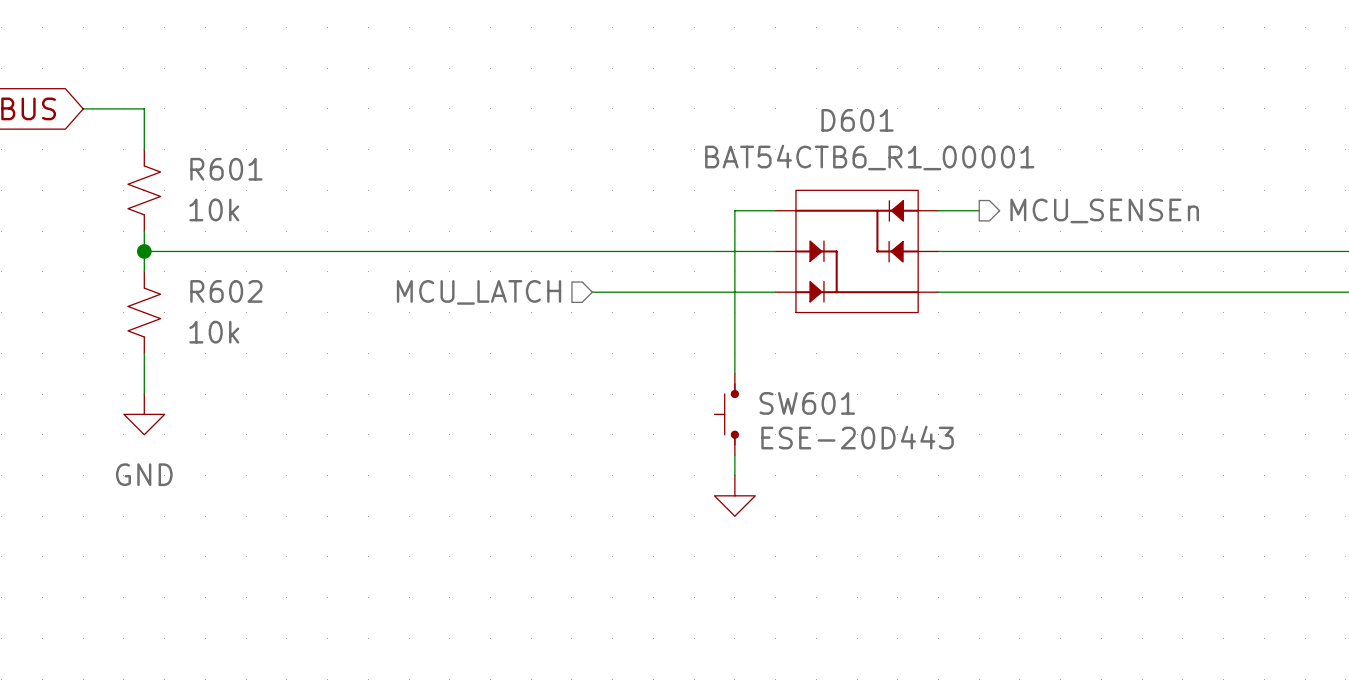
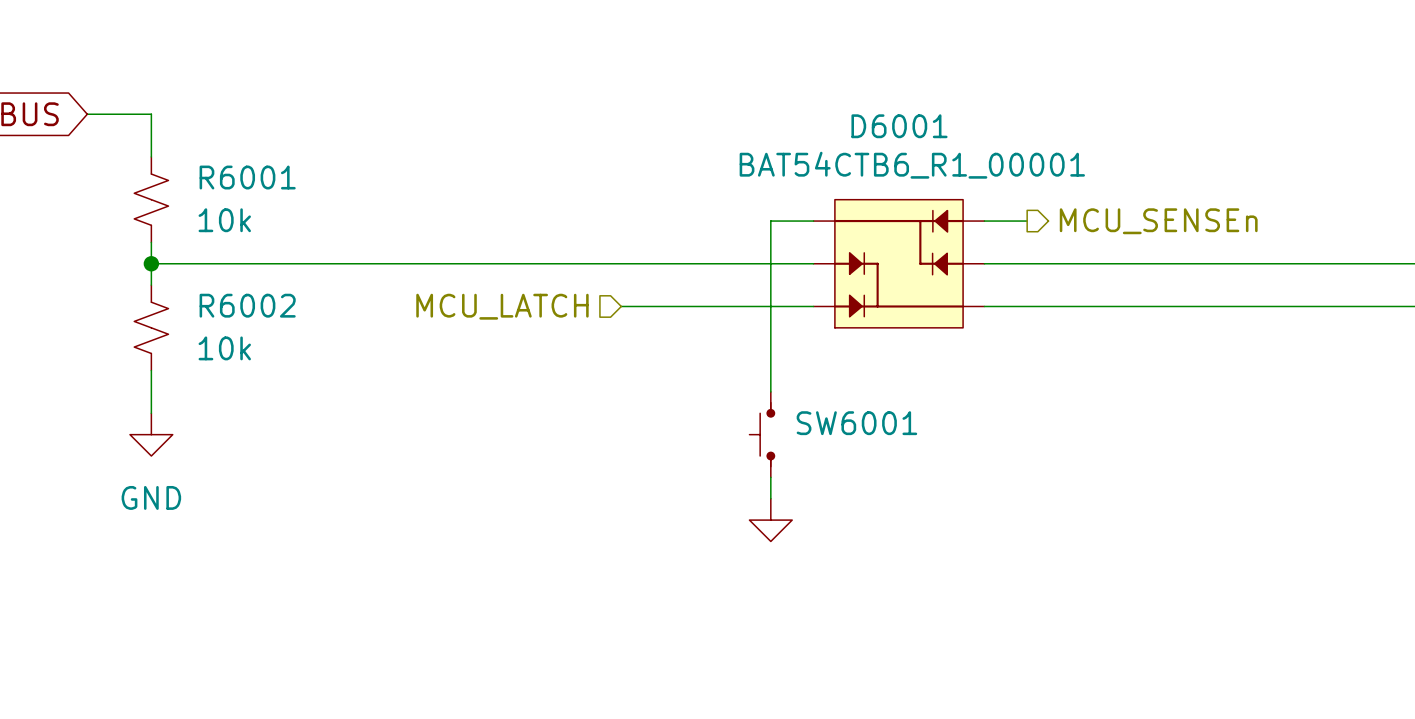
D601 name: D601 (857, 120) -> D6001 (899, 126)
R601 name: R601 (226, 169) -> R6001 (247, 177)
R602 name: R602 (226, 291) -> R6002 (247, 305)
SW601 name: SW601 (807, 403) -> SW6001 (856, 423)
SW601 text: ESE-20D443 (857, 437) -> none

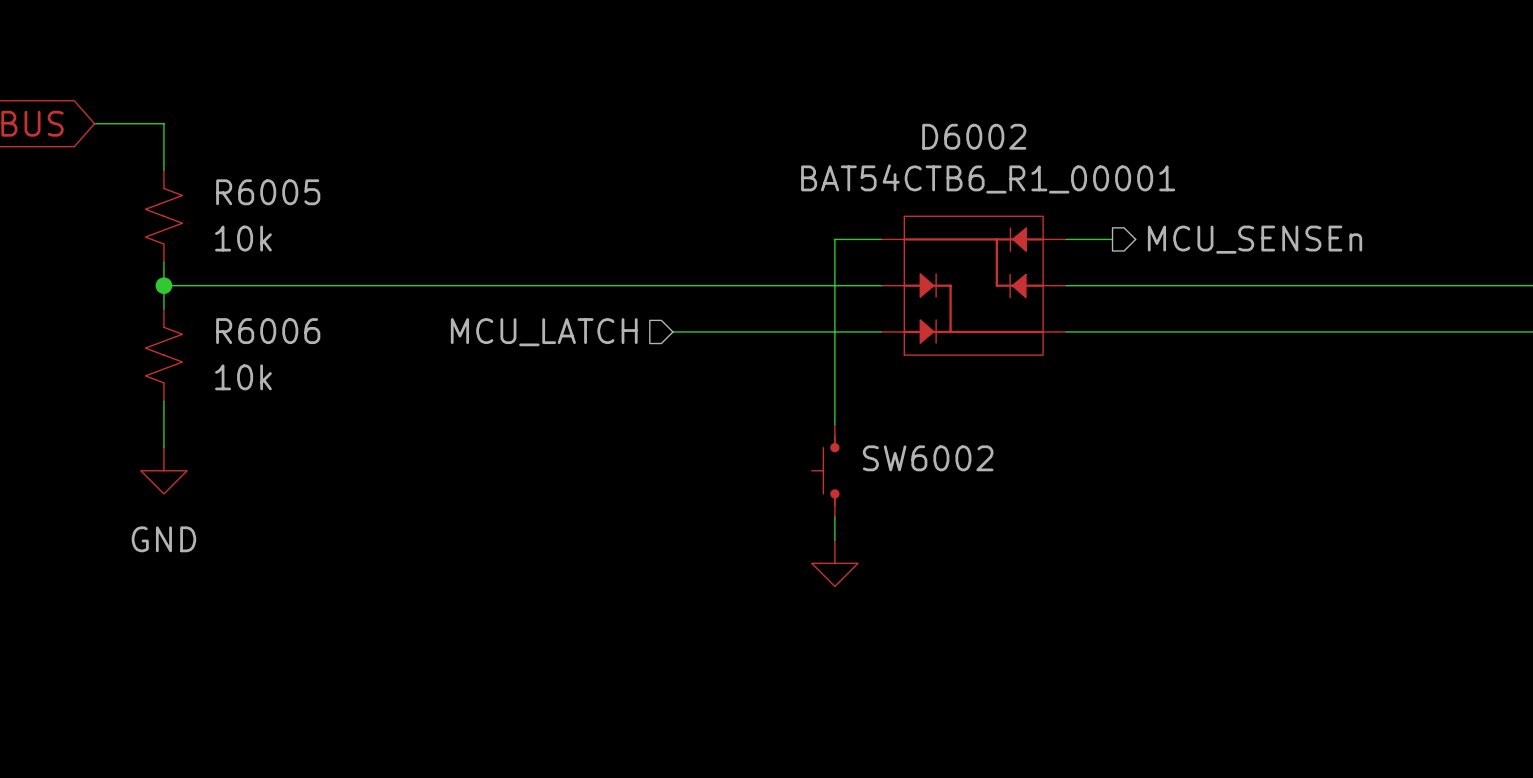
D6001 name: D6001 (899, 126) -> D6002 (974, 136)
R6001 name: R6001 (247, 177) -> R6005 (268, 192)
R6002 name: R6002 (247, 305) -> R6006 (268, 331)
SW6001 name: SW6001 (856, 423) -> SW6002 (928, 458)

